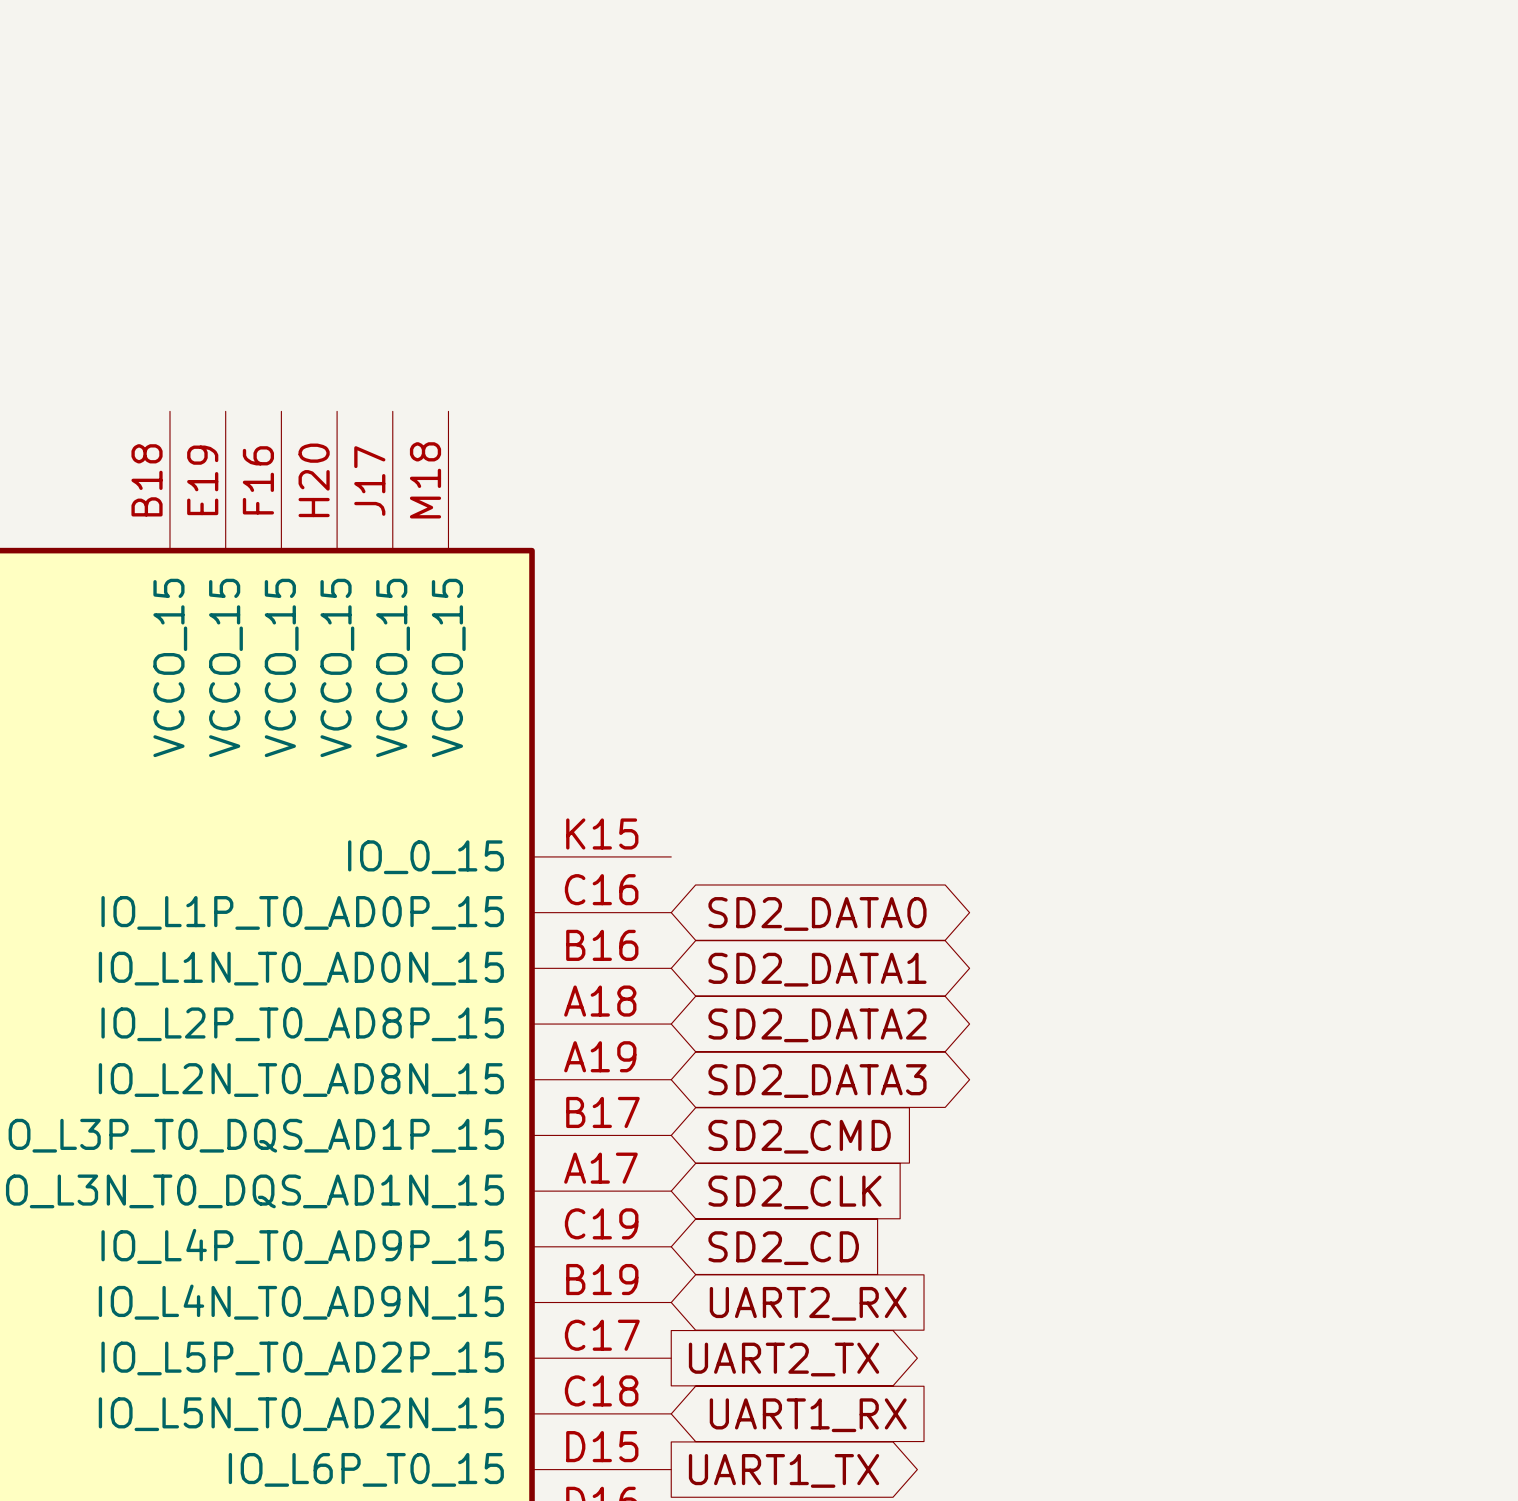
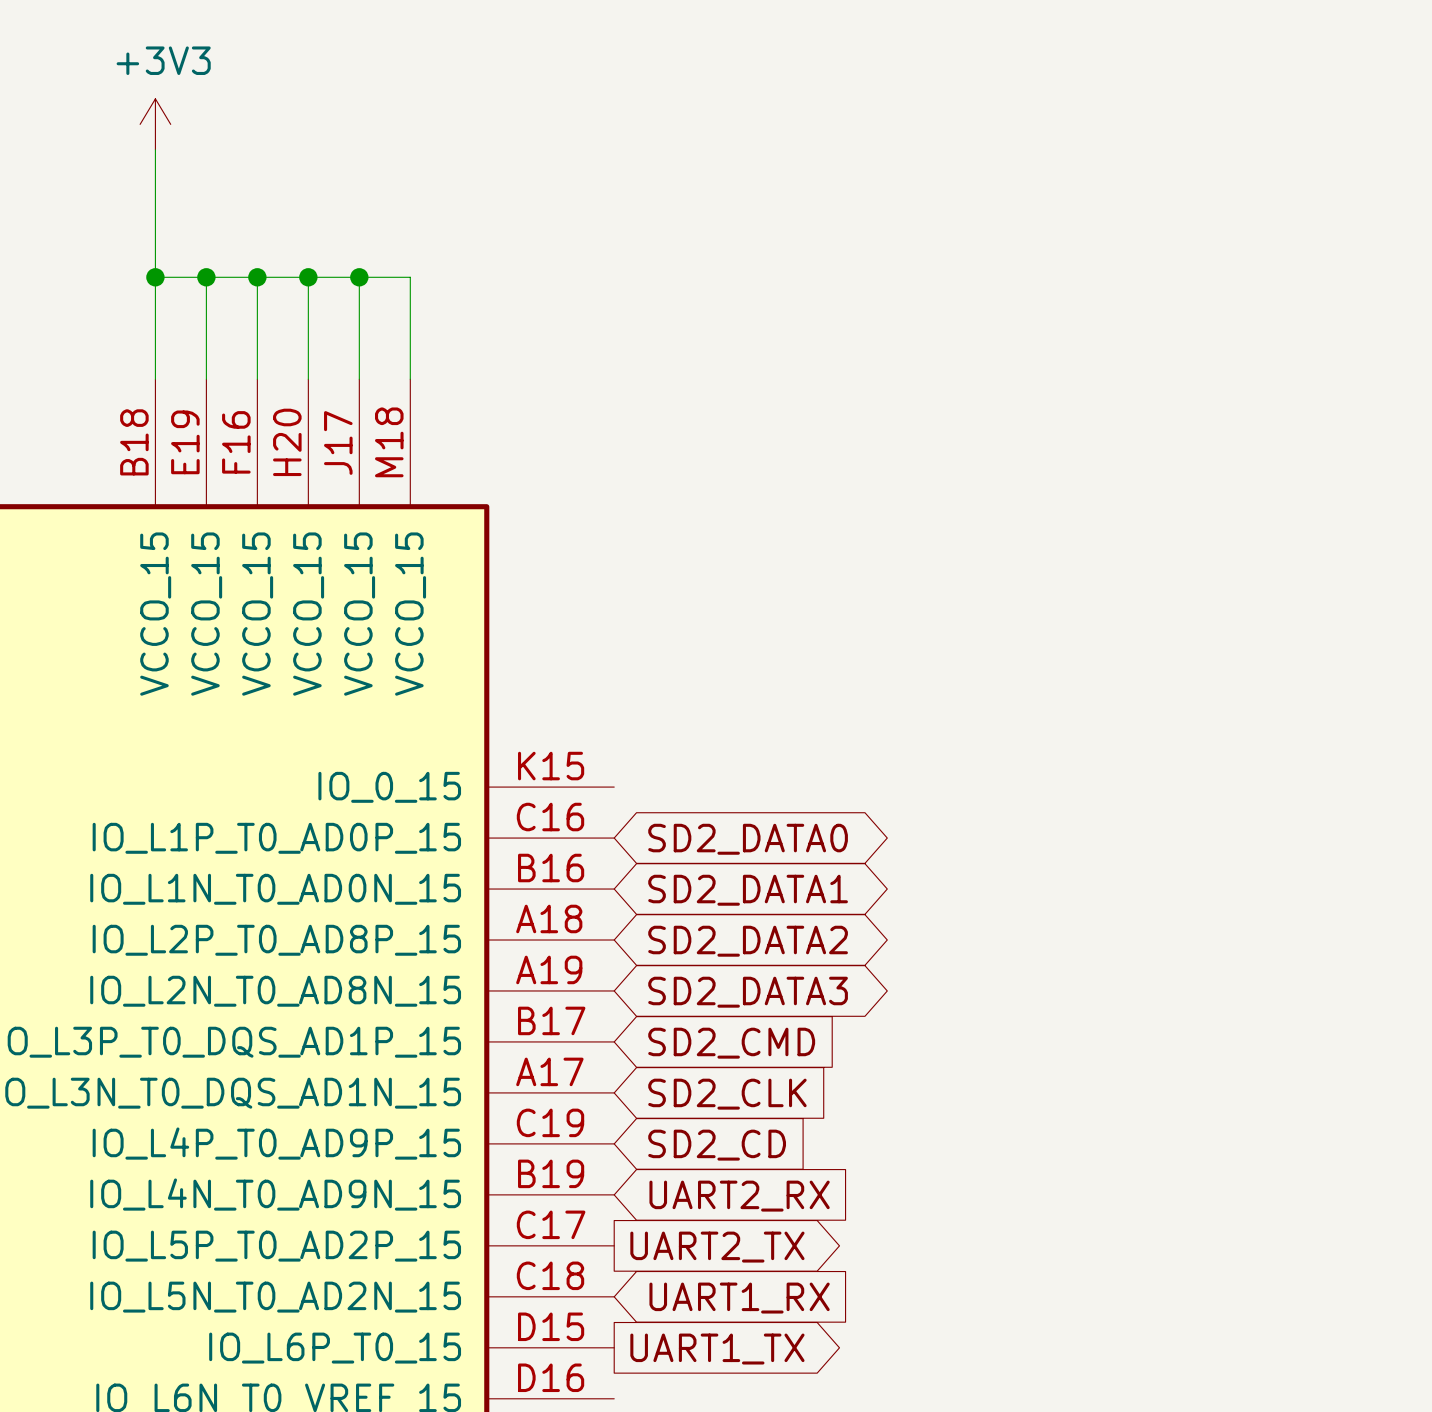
power symbol: none -> +3V3 (155, 124)
wire: none -> (155, 149) (155, 379)
wire: none -> (155, 277) (410, 277) (410, 379)
junction: none -> (155, 277)
wire: none -> (206, 277) (206, 379)
junction: none -> (206, 277)
wire: none -> (257, 277) (257, 379)
junction: none -> (257, 277)
wire: none -> (308, 277) (308, 379)
junction: none -> (308, 277)
wire: none -> (359, 277) (359, 379)
junction: none -> (359, 277)

